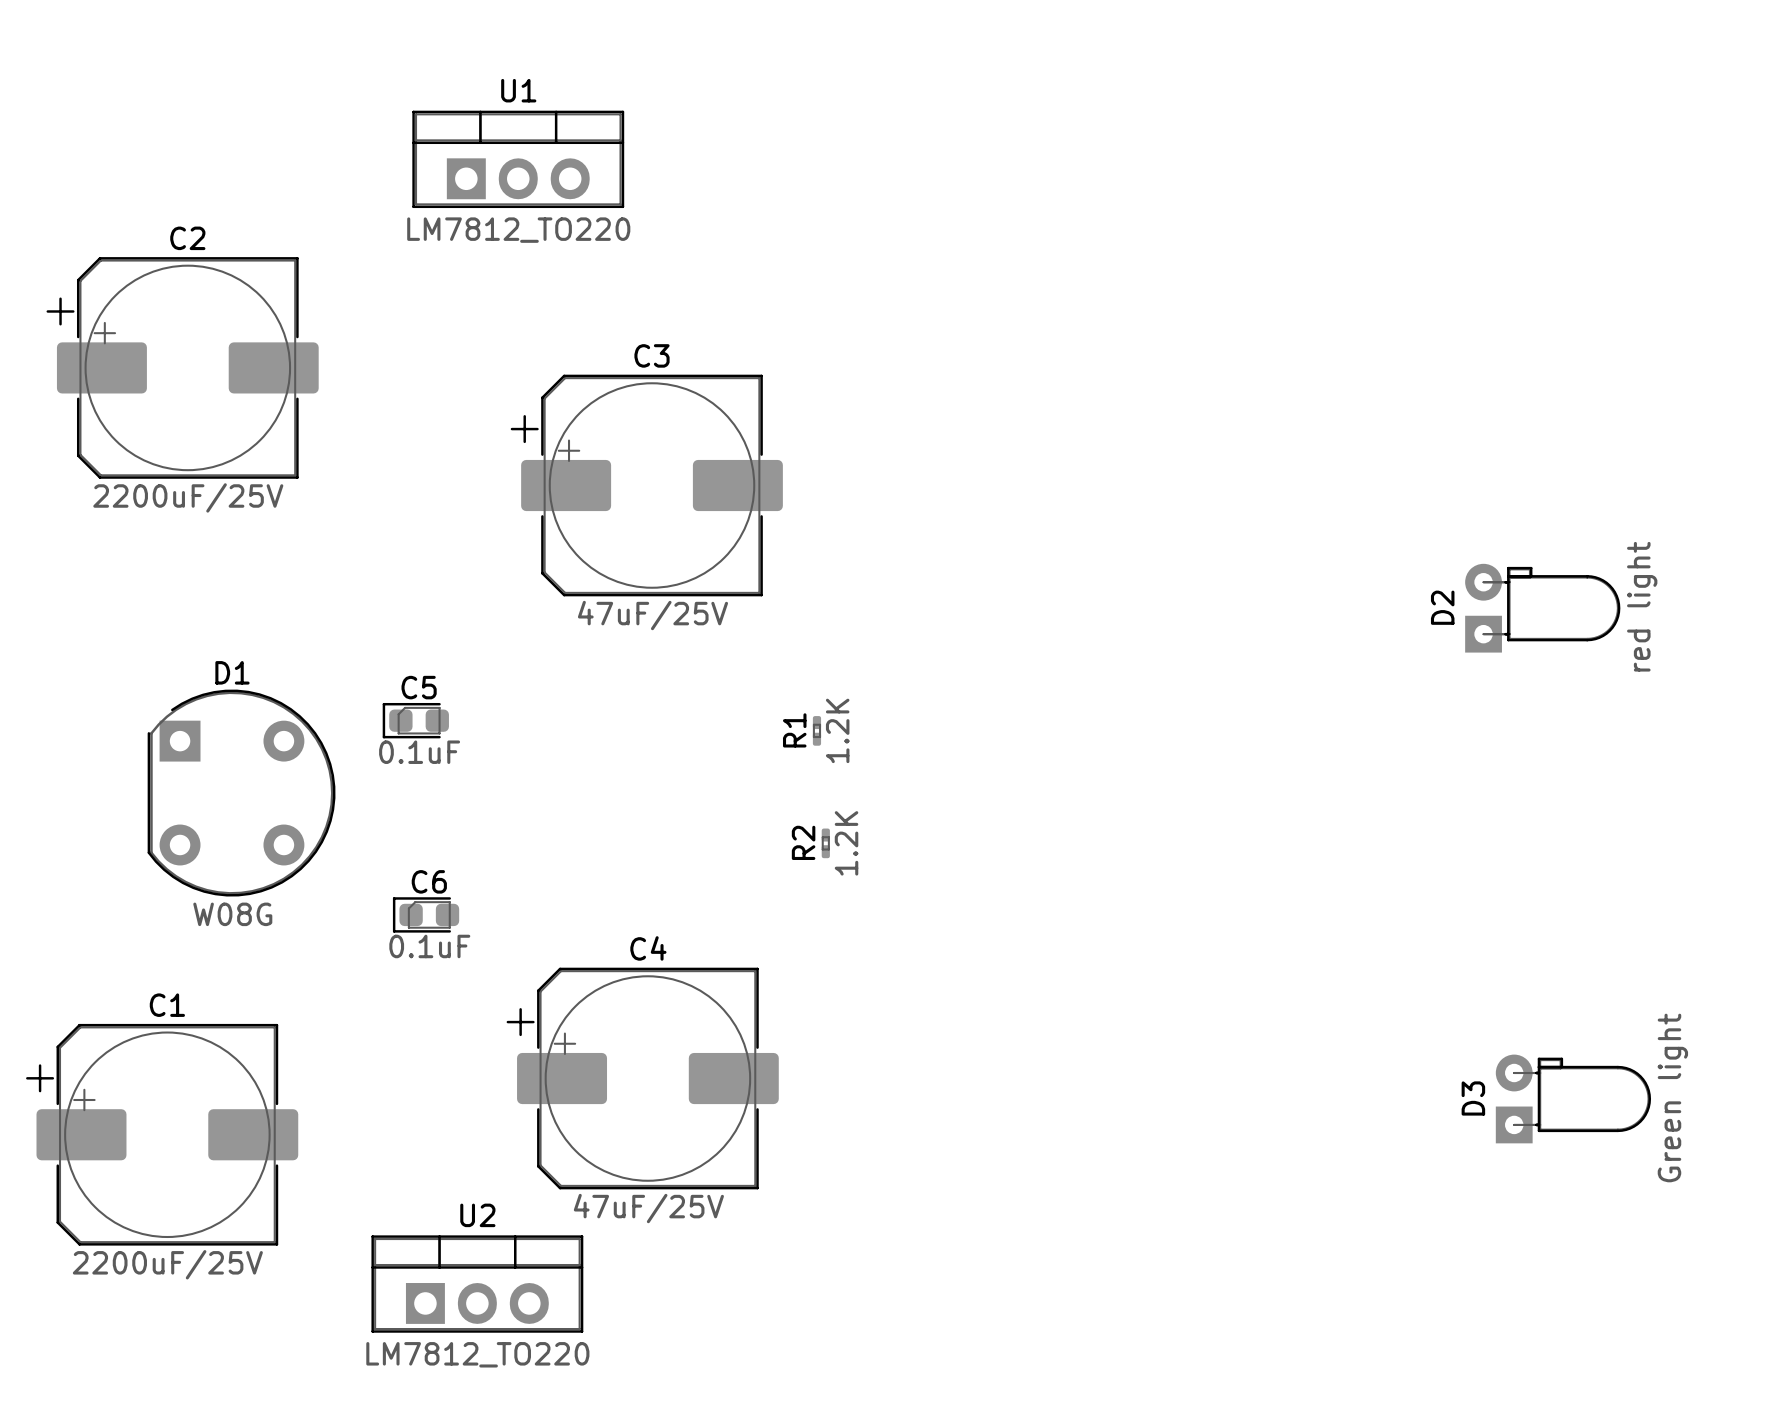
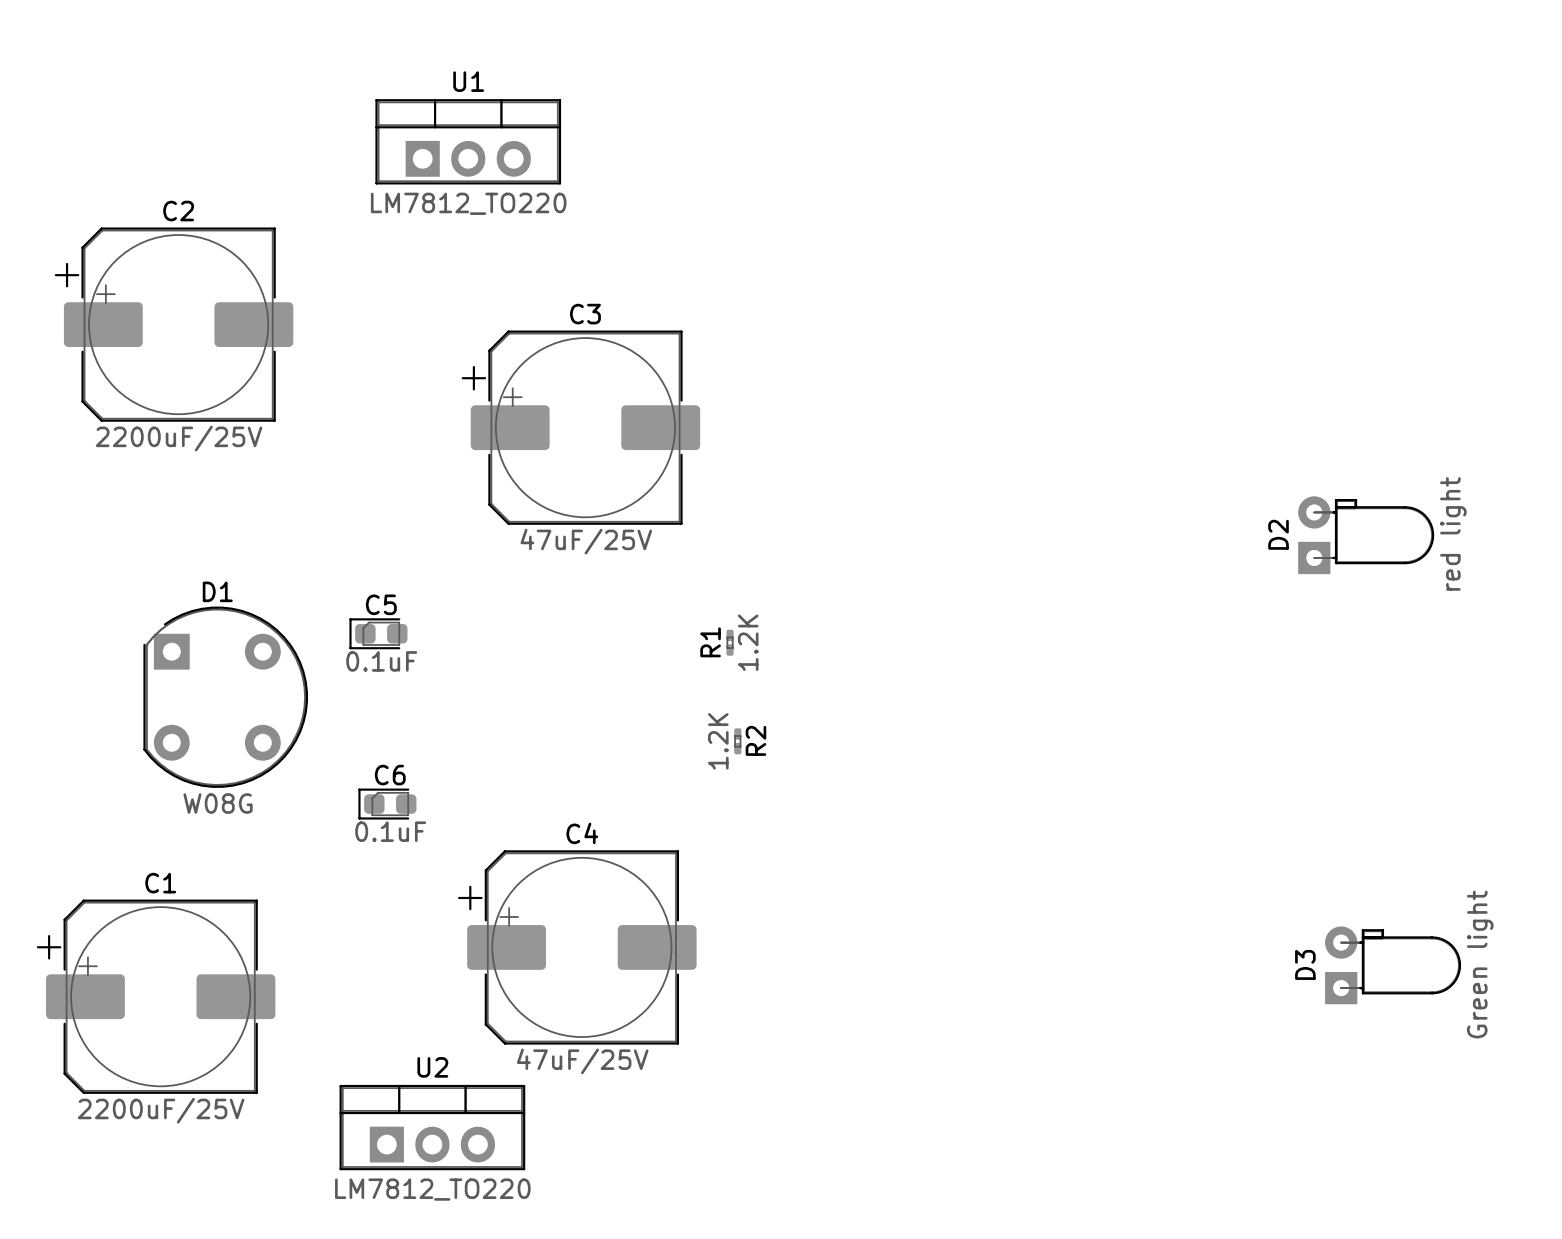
R2 name position: R2 (803, 842) -> R2 (755, 740)
R2 value position: 1.2K (846, 843) -> 1.2K (718, 741)

